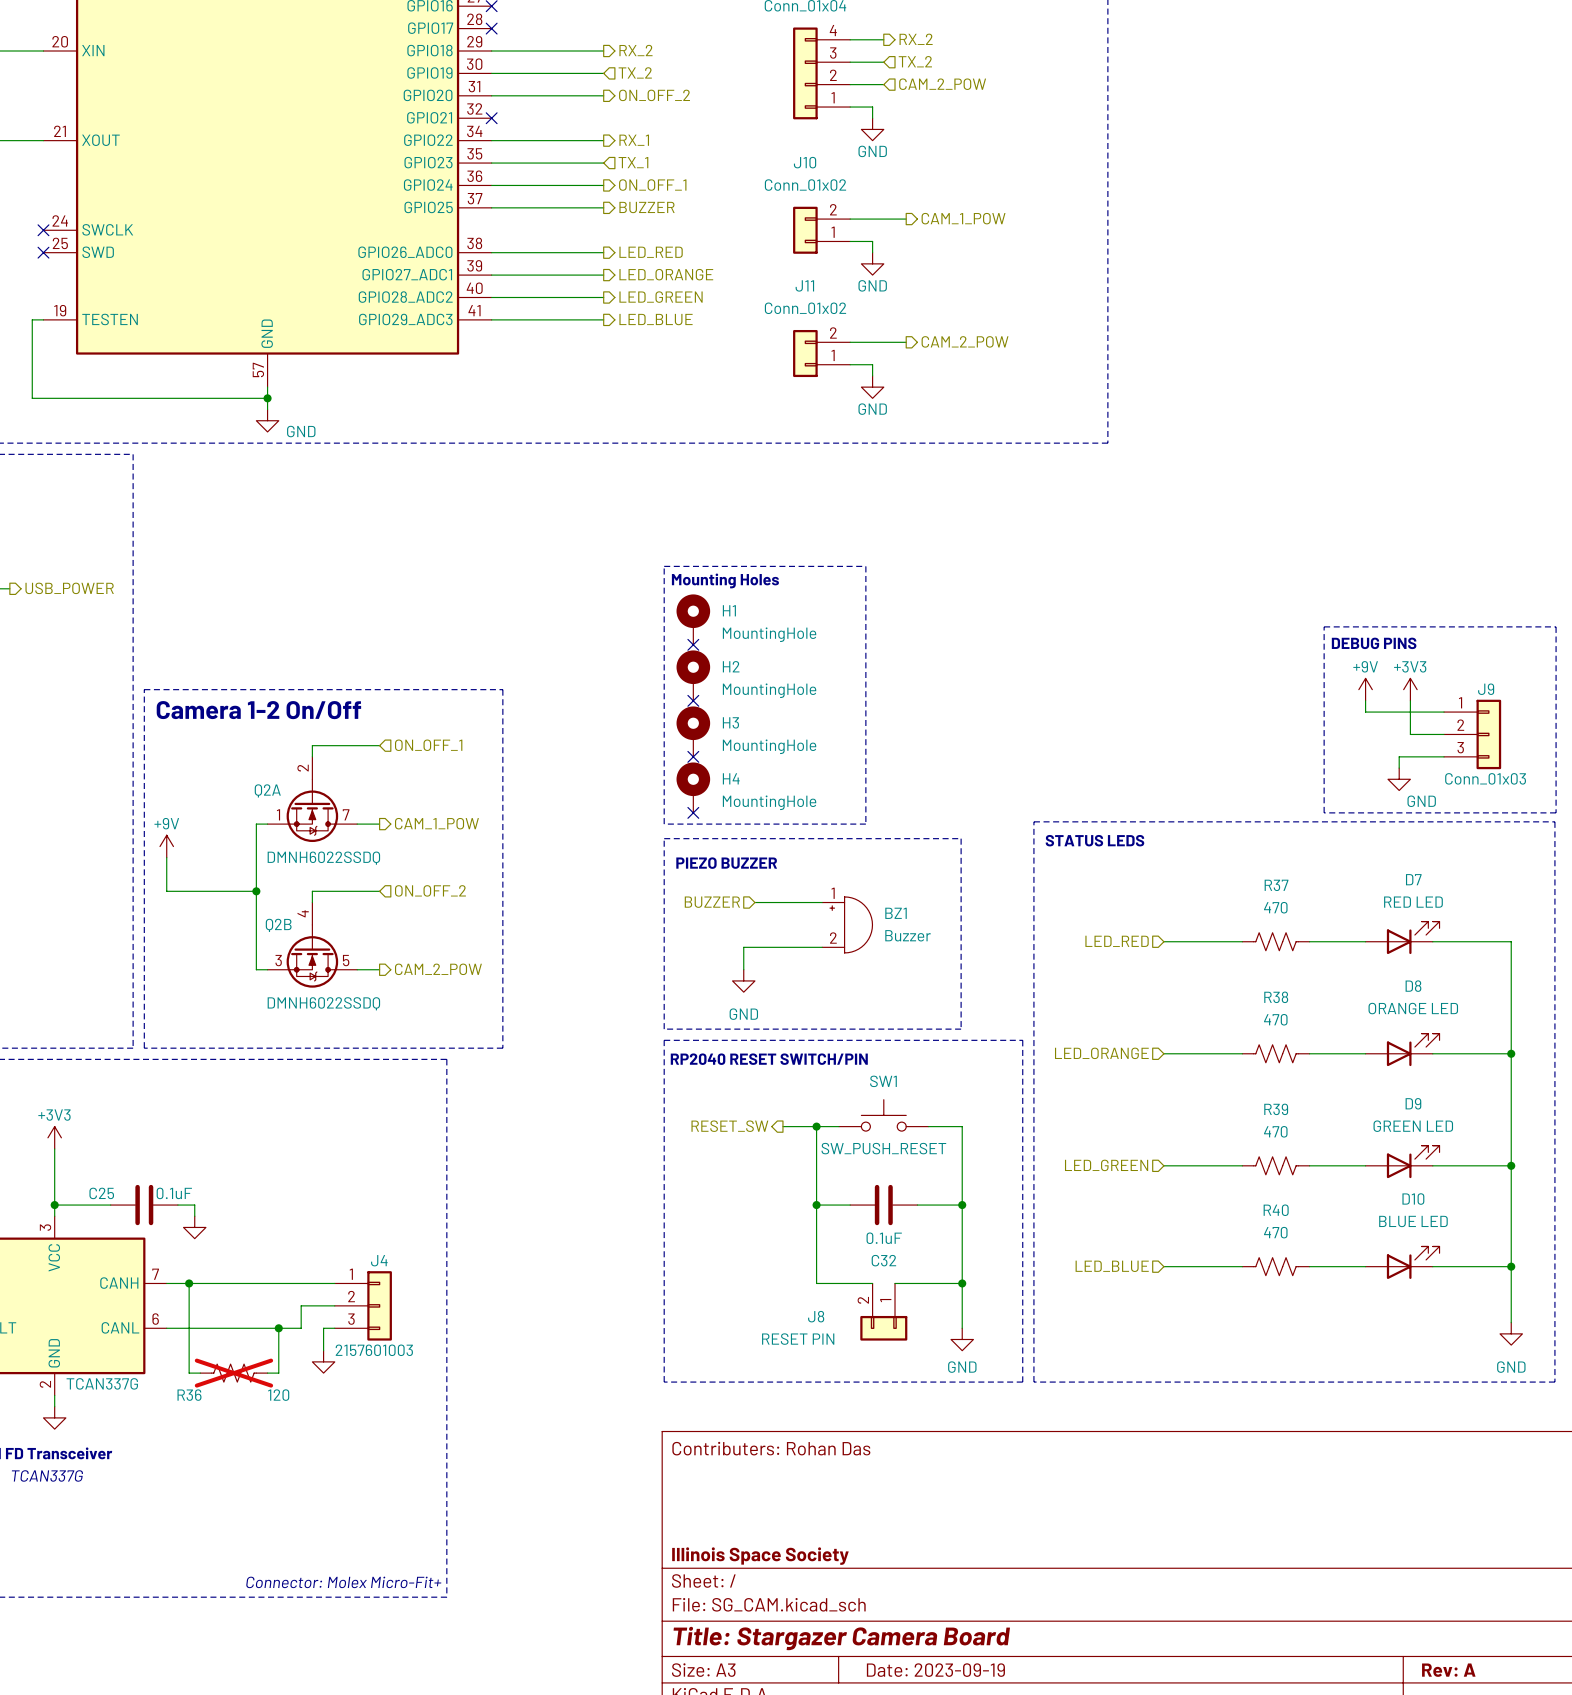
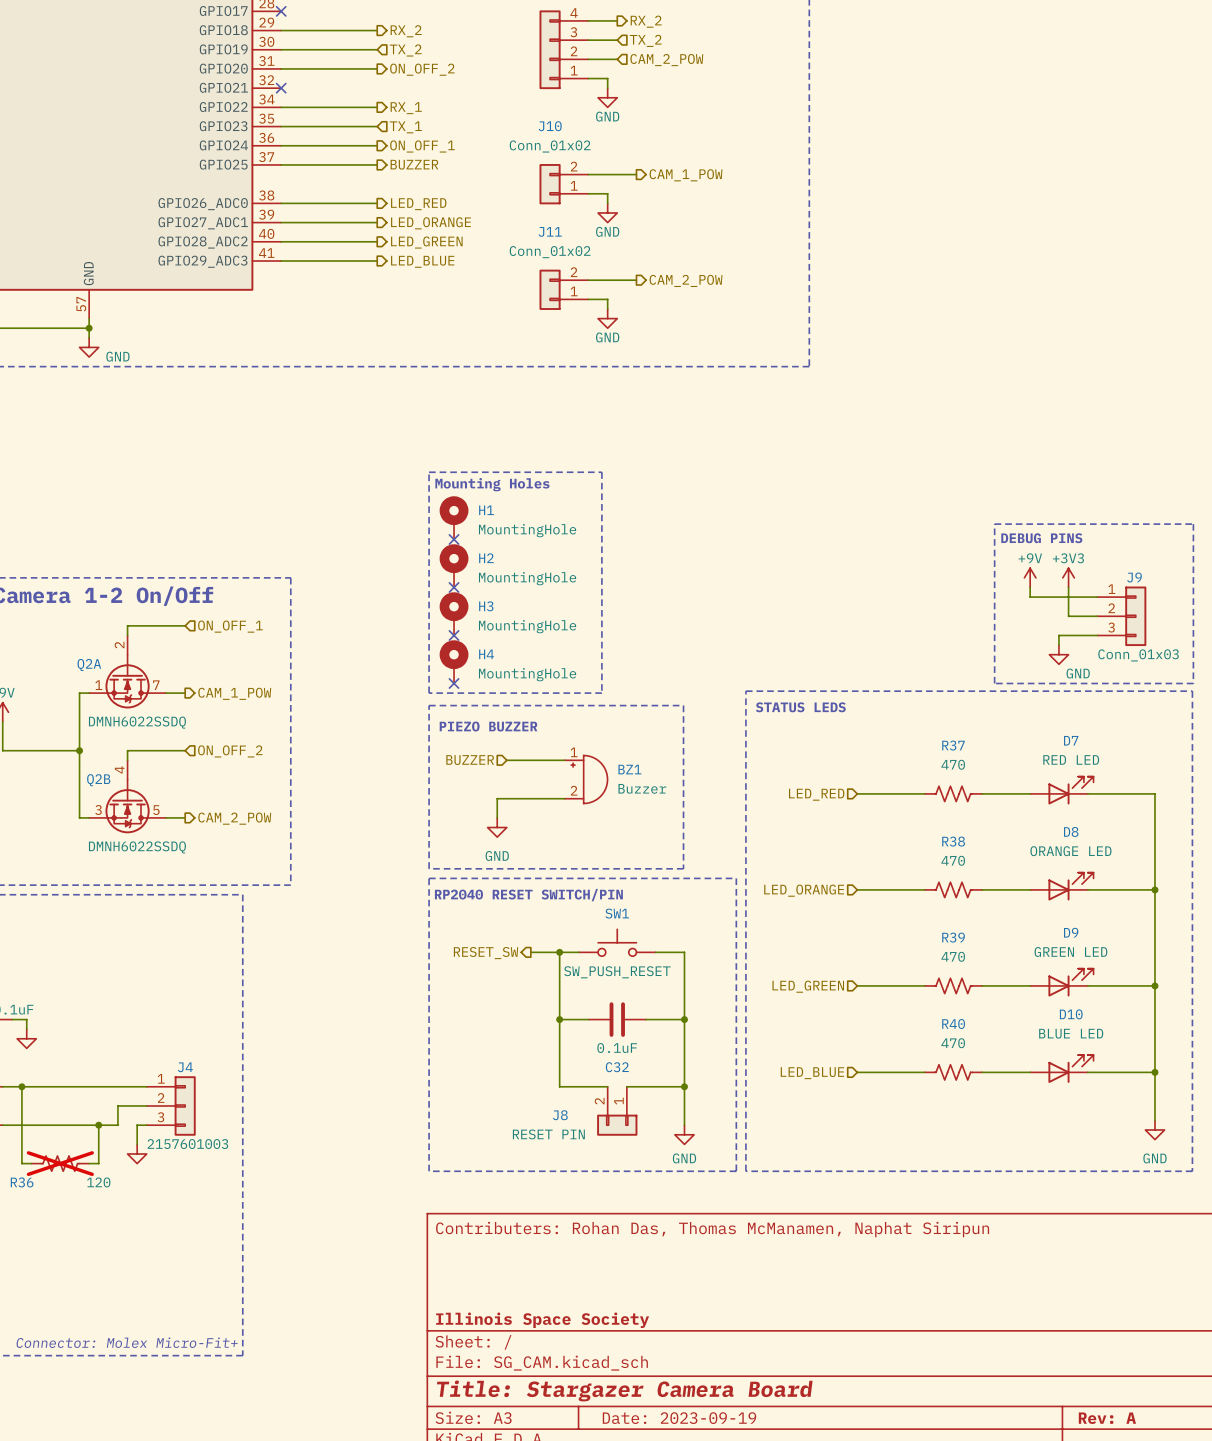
title block: Contributers: Rohan Das (771, 1448) -> Contributers: Rohan Das, Thomas McManamen, Naphat Siripun (712, 1229)

